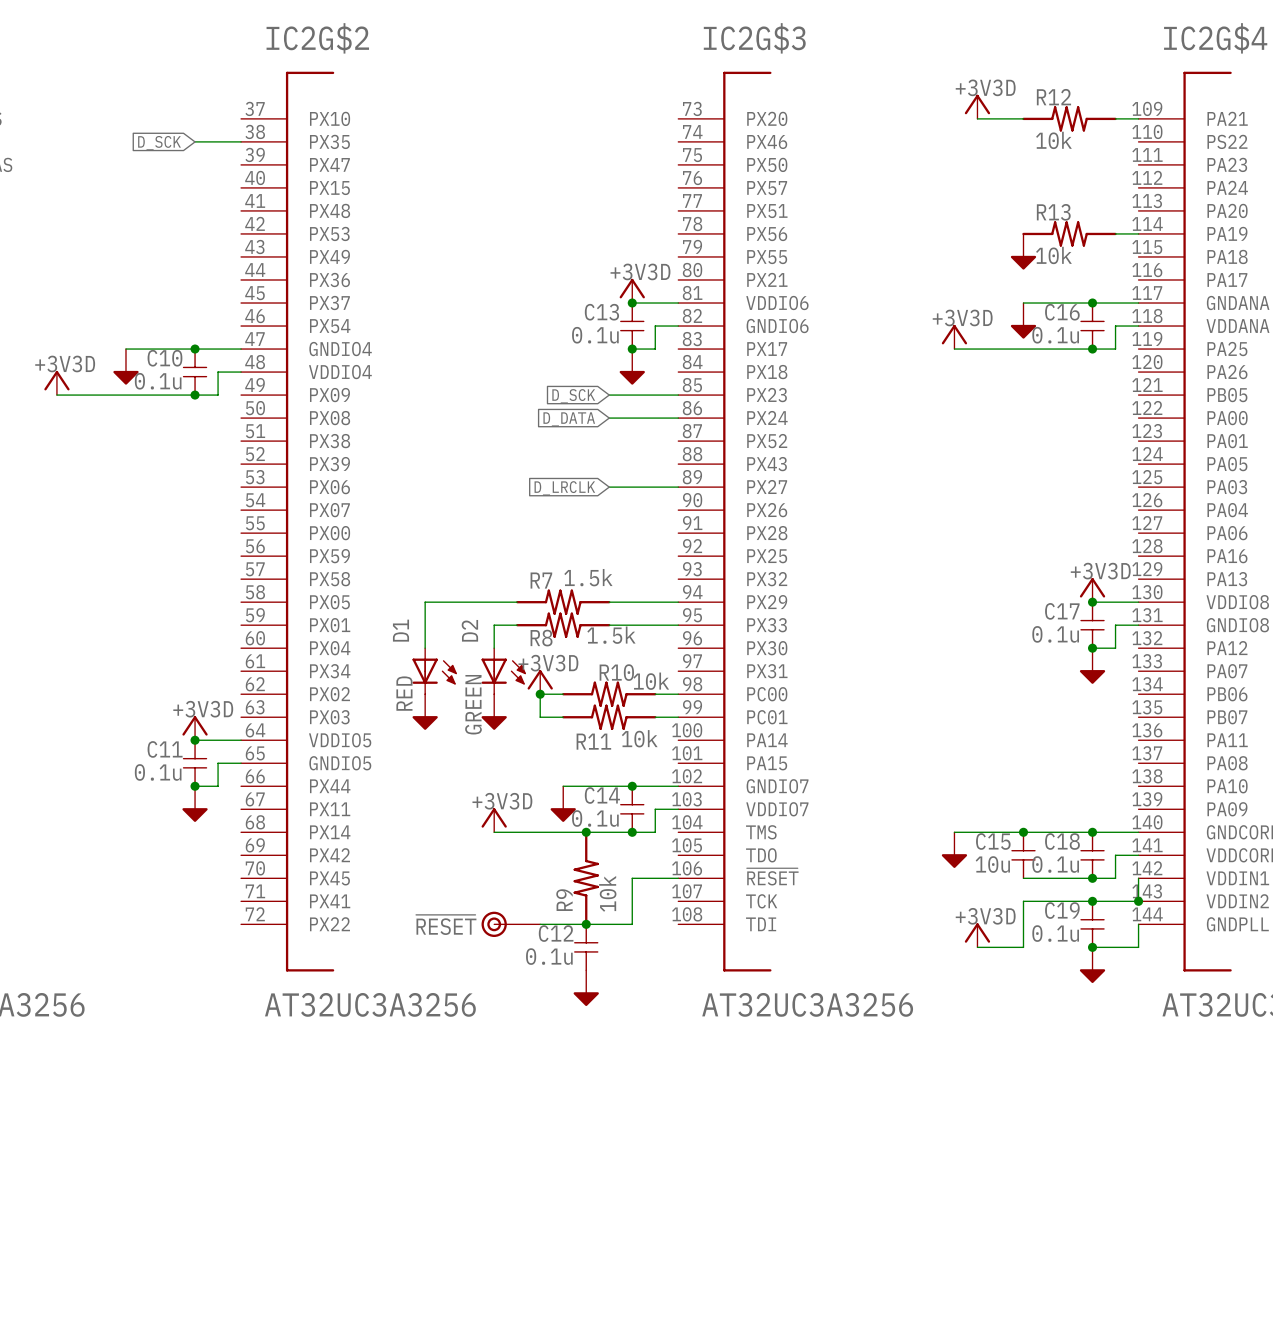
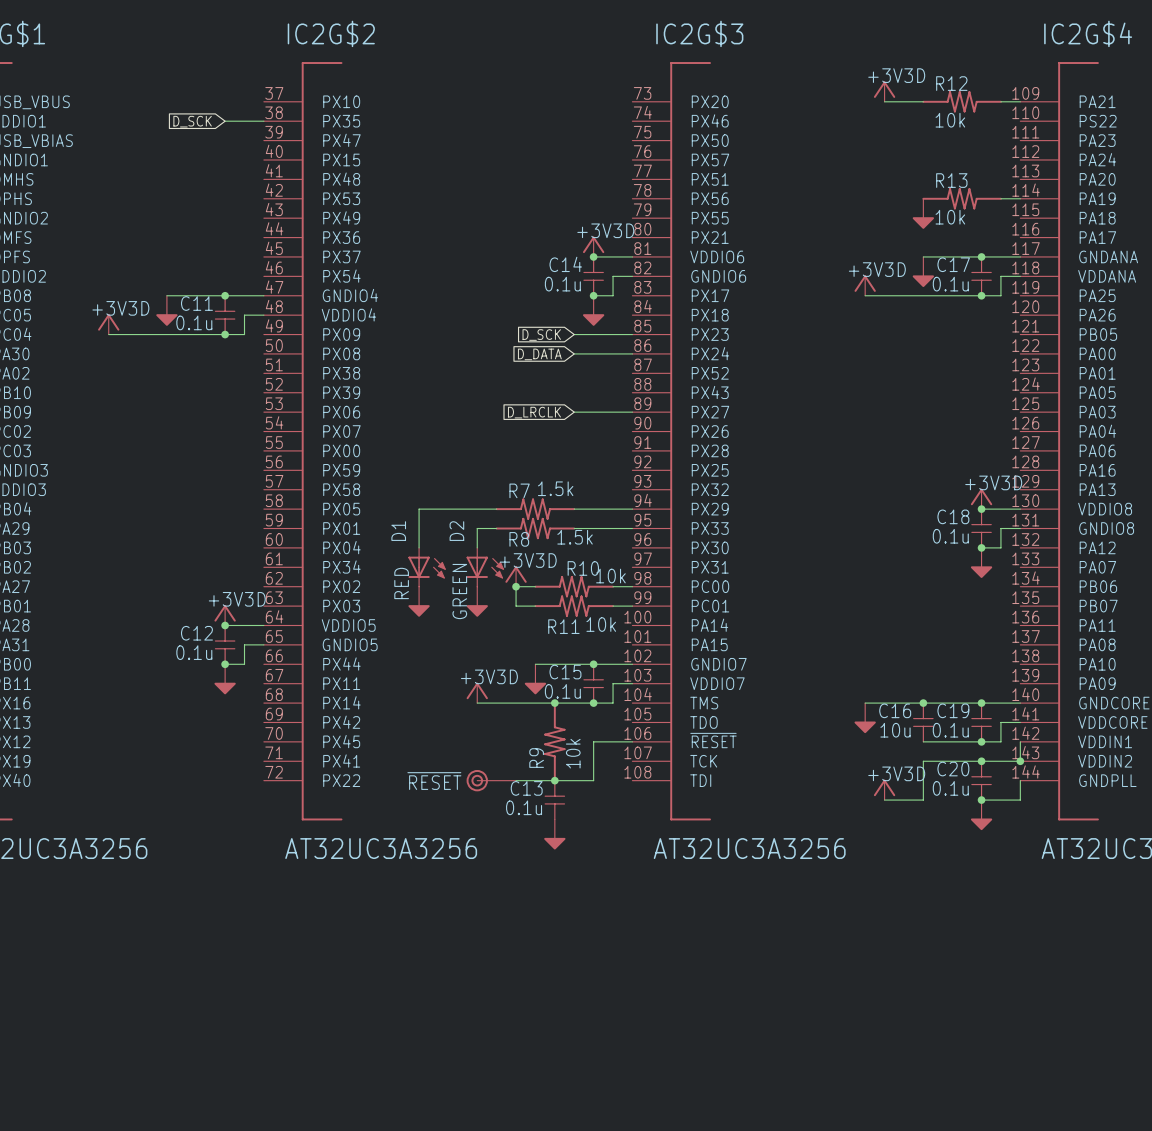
C13 name: C13 (601, 312) -> C14 (565, 264)
C16 name: C16 (1062, 312) -> C17 (953, 264)
C10 name: C10 (164, 358) -> C11 (196, 303)
C17 name: C17 (1062, 611) -> C18 (953, 516)
C11 name: C11 (165, 749) -> C12 (196, 633)
C14 name: C14 (602, 795) -> C15 (565, 672)
C15 name: C15 (993, 841) -> C16 (895, 710)
C18 name: C18 (1062, 841) -> C19 (953, 710)
C19 name: C19 (1062, 910) -> C20 (953, 769)
C12 name: C12 (556, 933) -> C13 (526, 788)

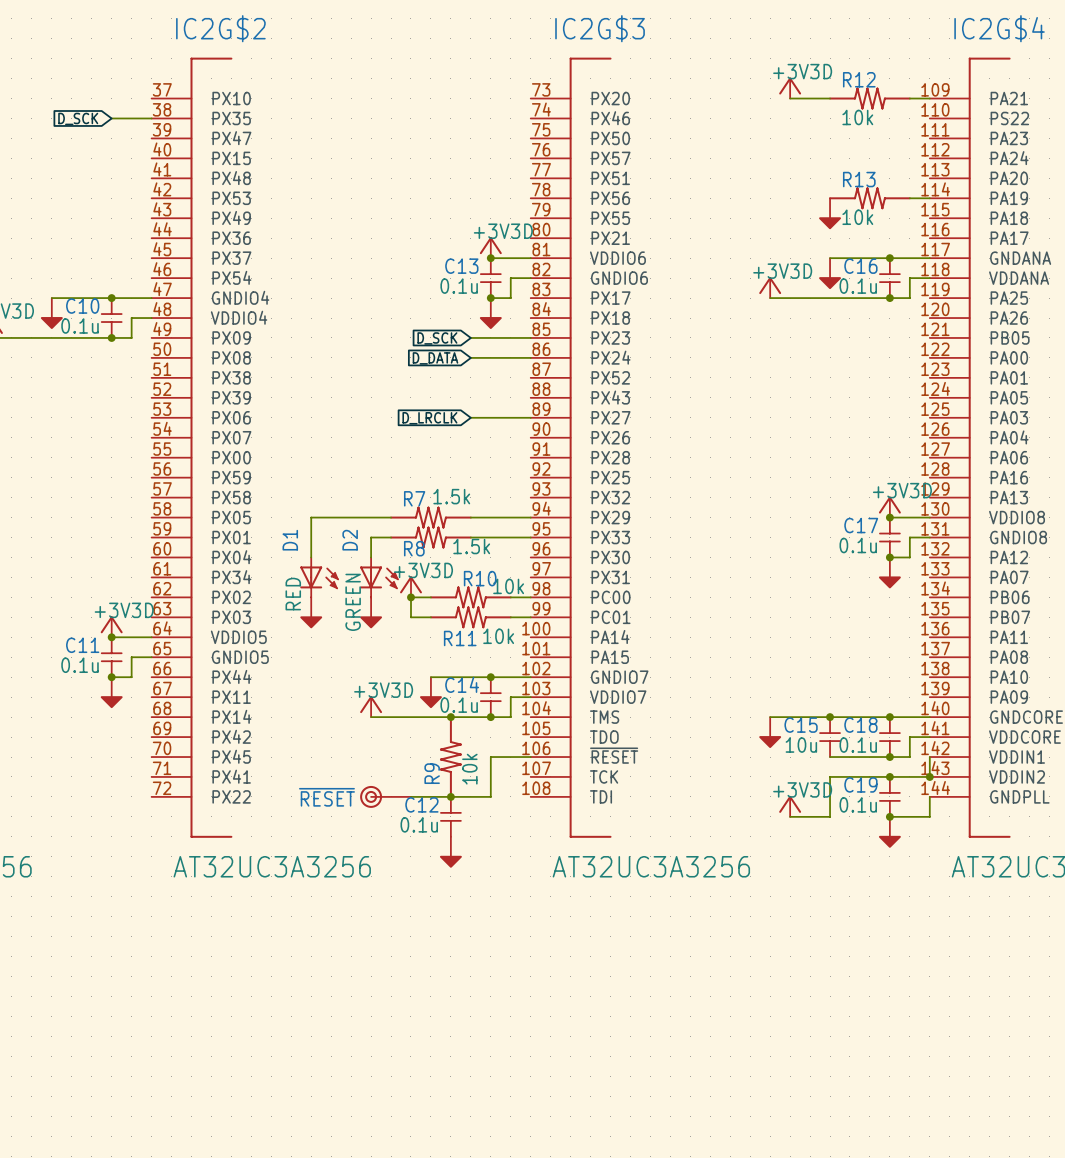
C14 name: C14 (565, 264) -> C13 (461, 266)
C17 name: C17 (953, 264) -> C16 (860, 266)
C11 name: C11 (196, 303) -> C10 (82, 306)
C18 name: C18 (953, 516) -> C17 (861, 525)
C12 name: C12 (196, 633) -> C11 (82, 645)
C15 name: C15 (565, 672) -> C14 (462, 684)
C16 name: C16 (895, 710) -> C15 (801, 725)
C19 name: C19 (953, 710) -> C18 (860, 725)
C20 name: C20 (953, 769) -> C19 (860, 784)
C13 name: C13 (526, 788) -> C12 (421, 804)

